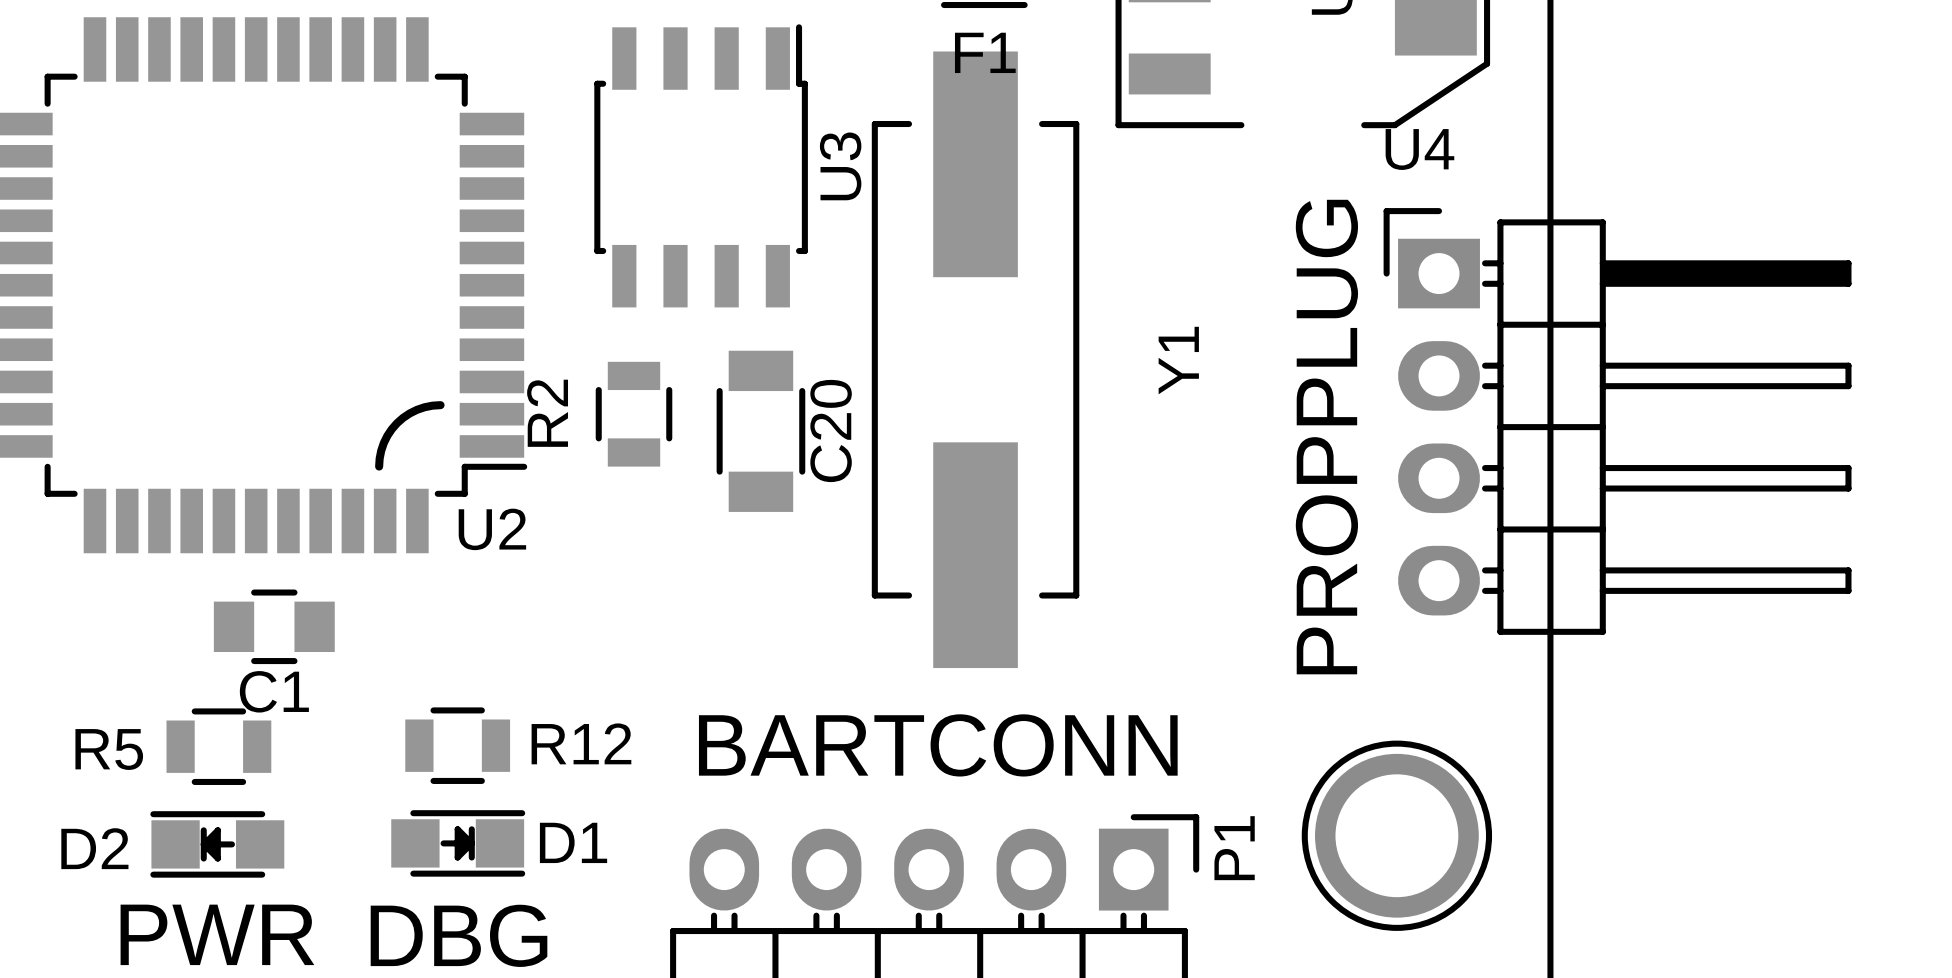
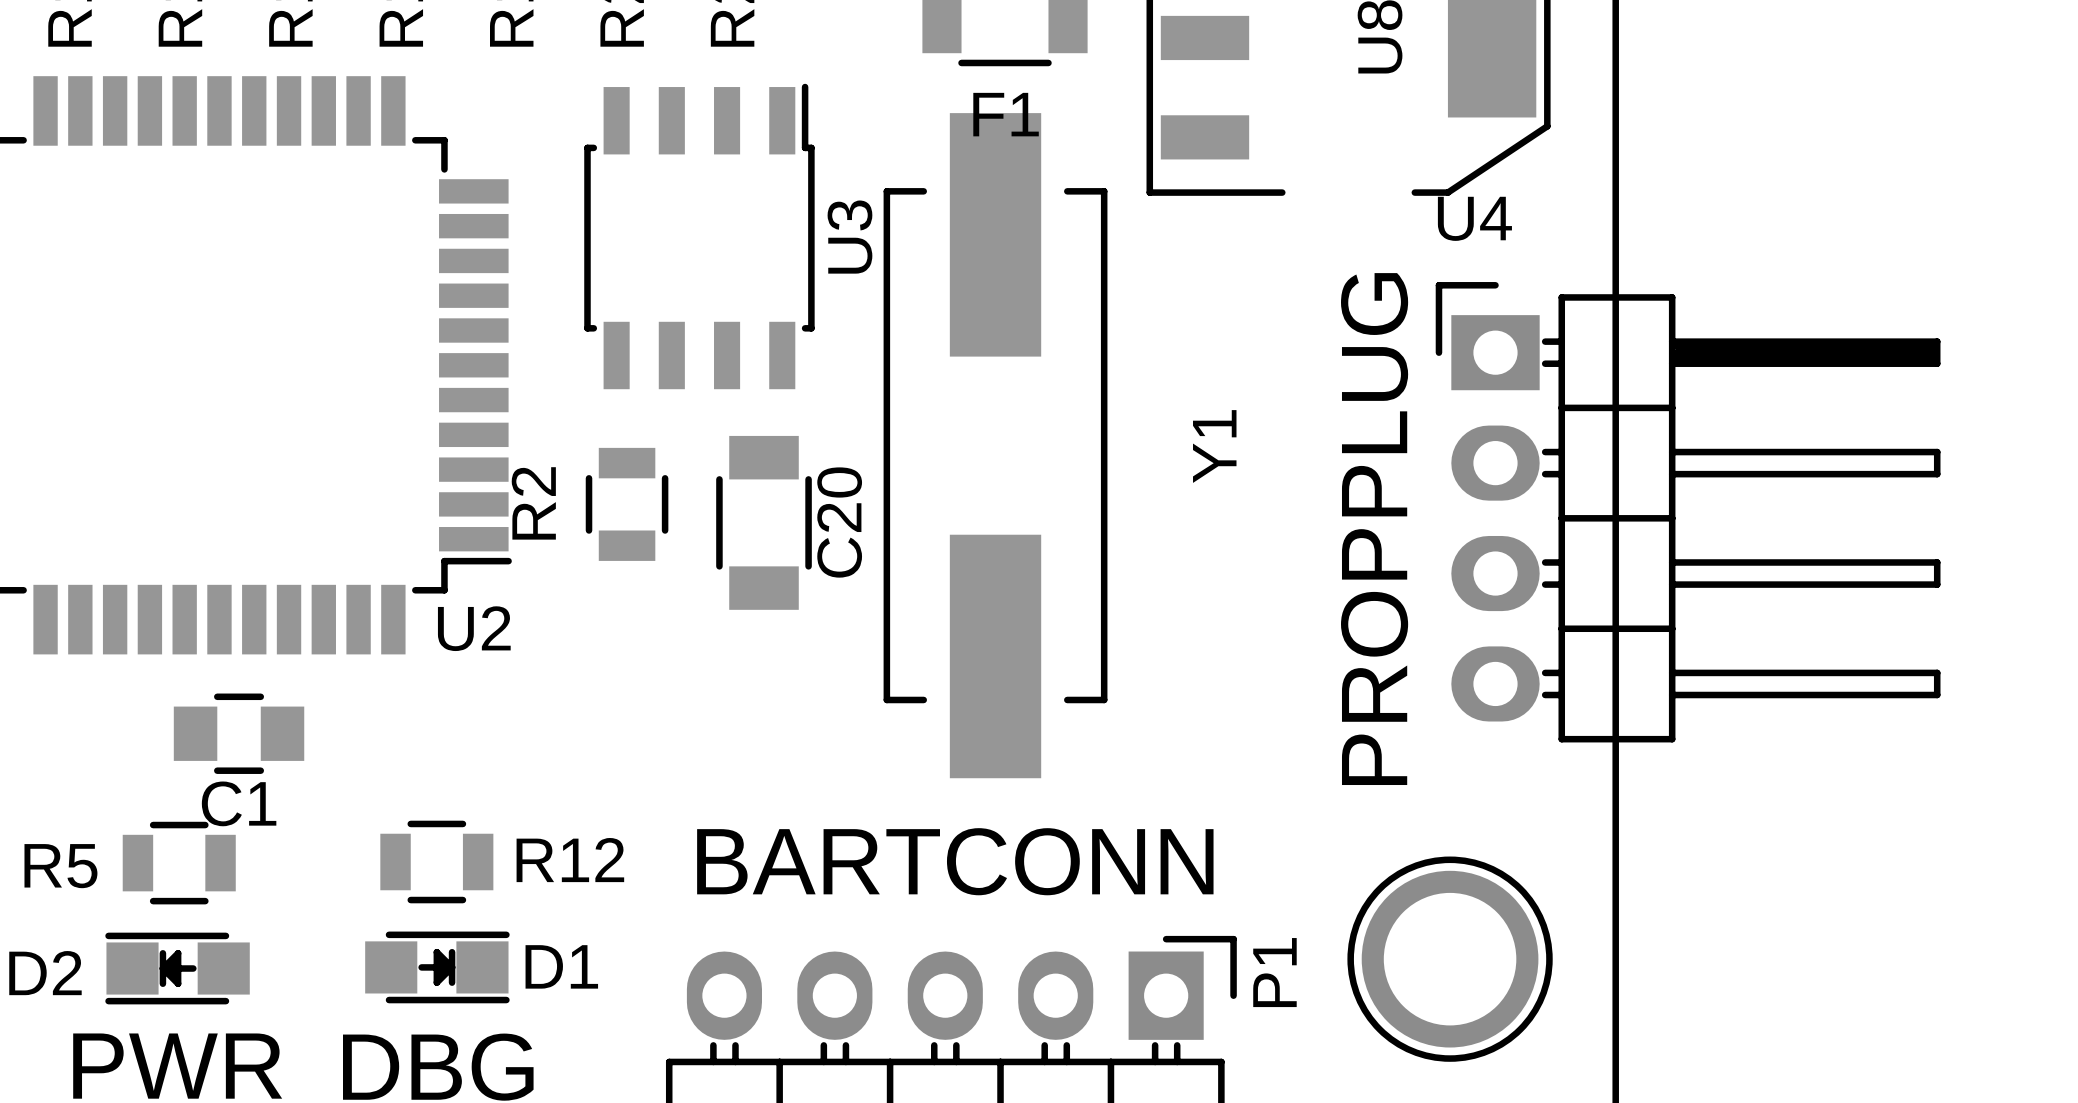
line: (440, 405) (417, 409) (397, 423) (383, 443) (379, 466) -> none

